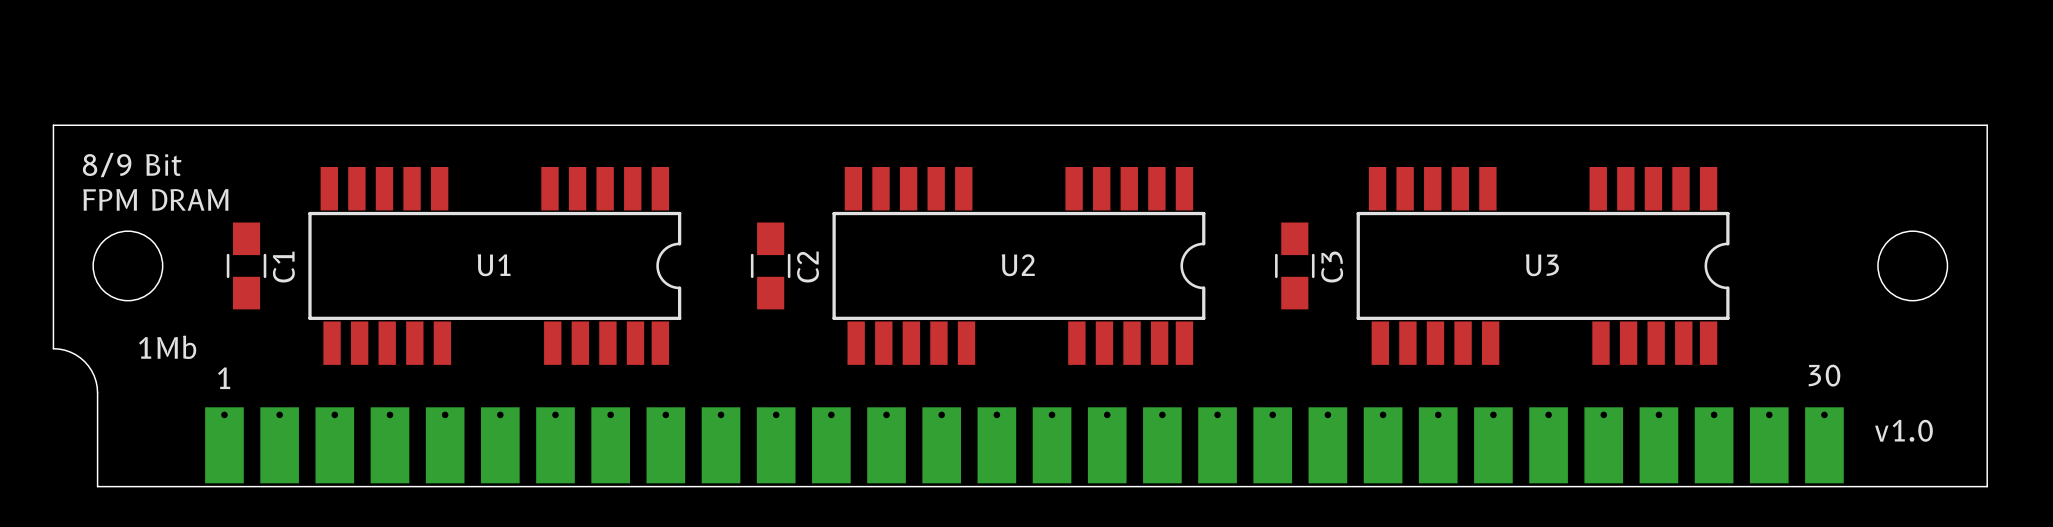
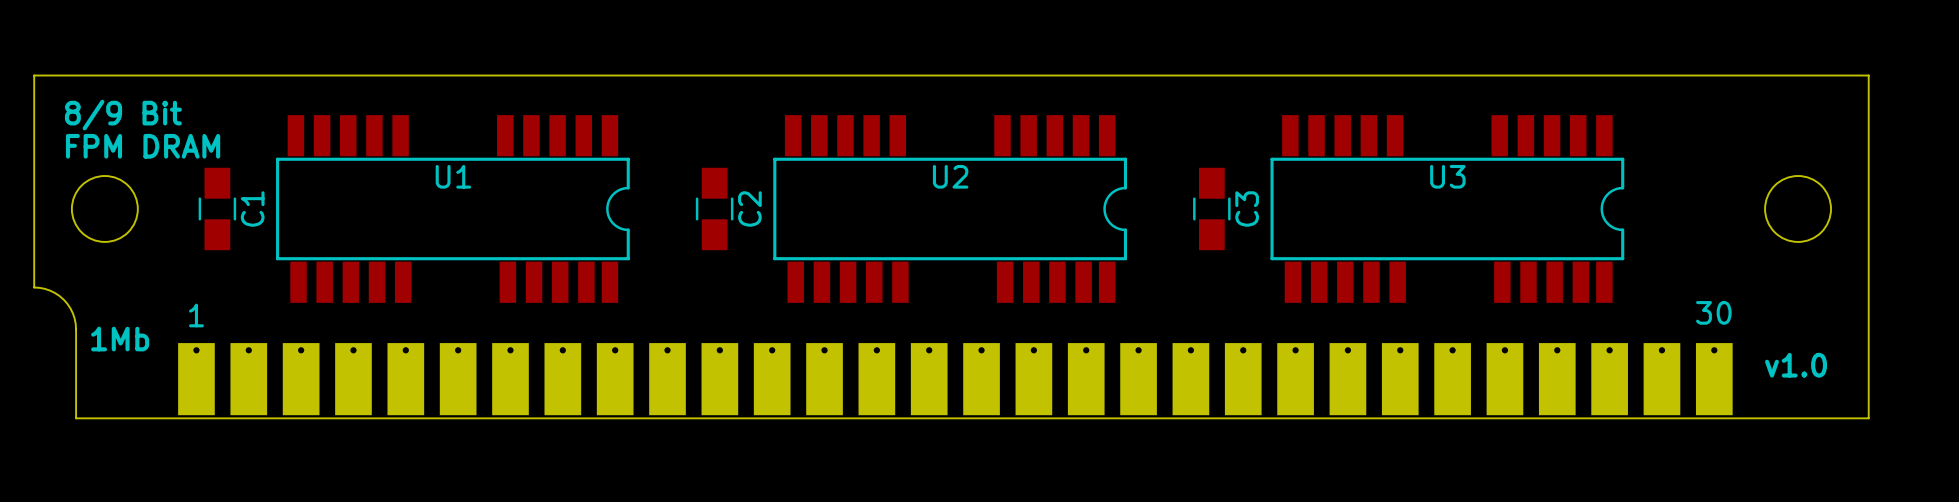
U1 name position: U1 (494, 265) -> U1 (453, 176)
U2 name position: U2 (1018, 265) -> U2 (950, 176)
U3 name position: U3 (1542, 265) -> U3 (1447, 176)
text position: 1Mb (167, 347) -> 1Mb (120, 339)

